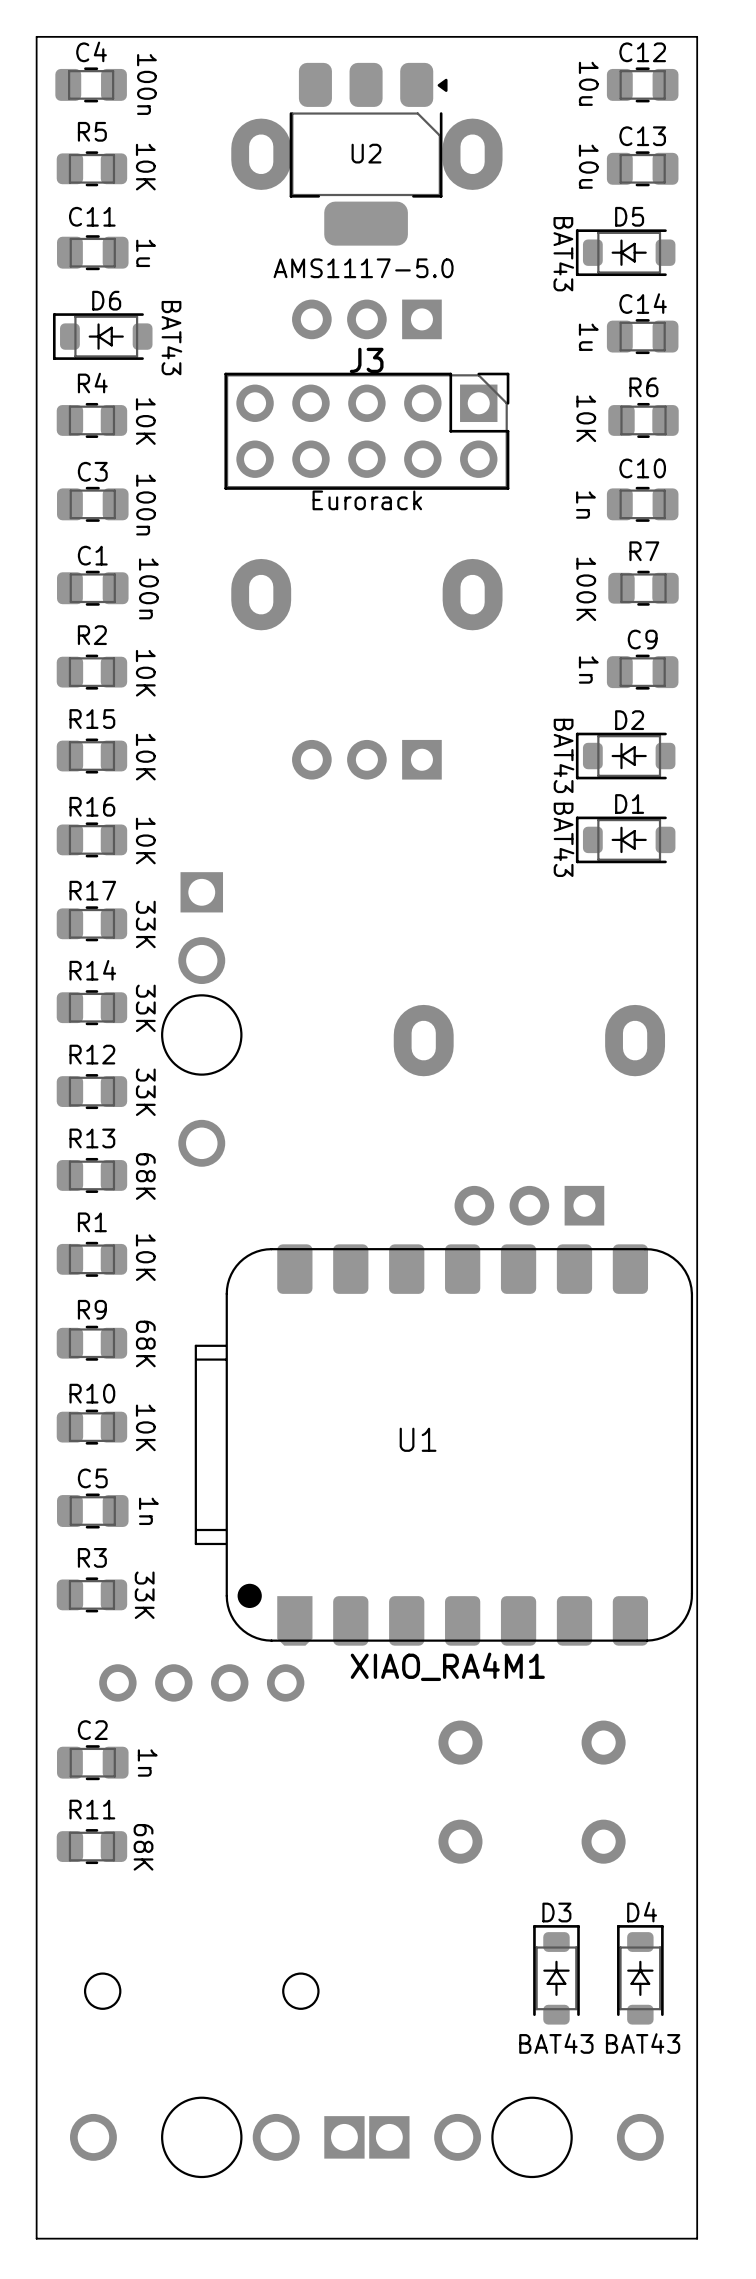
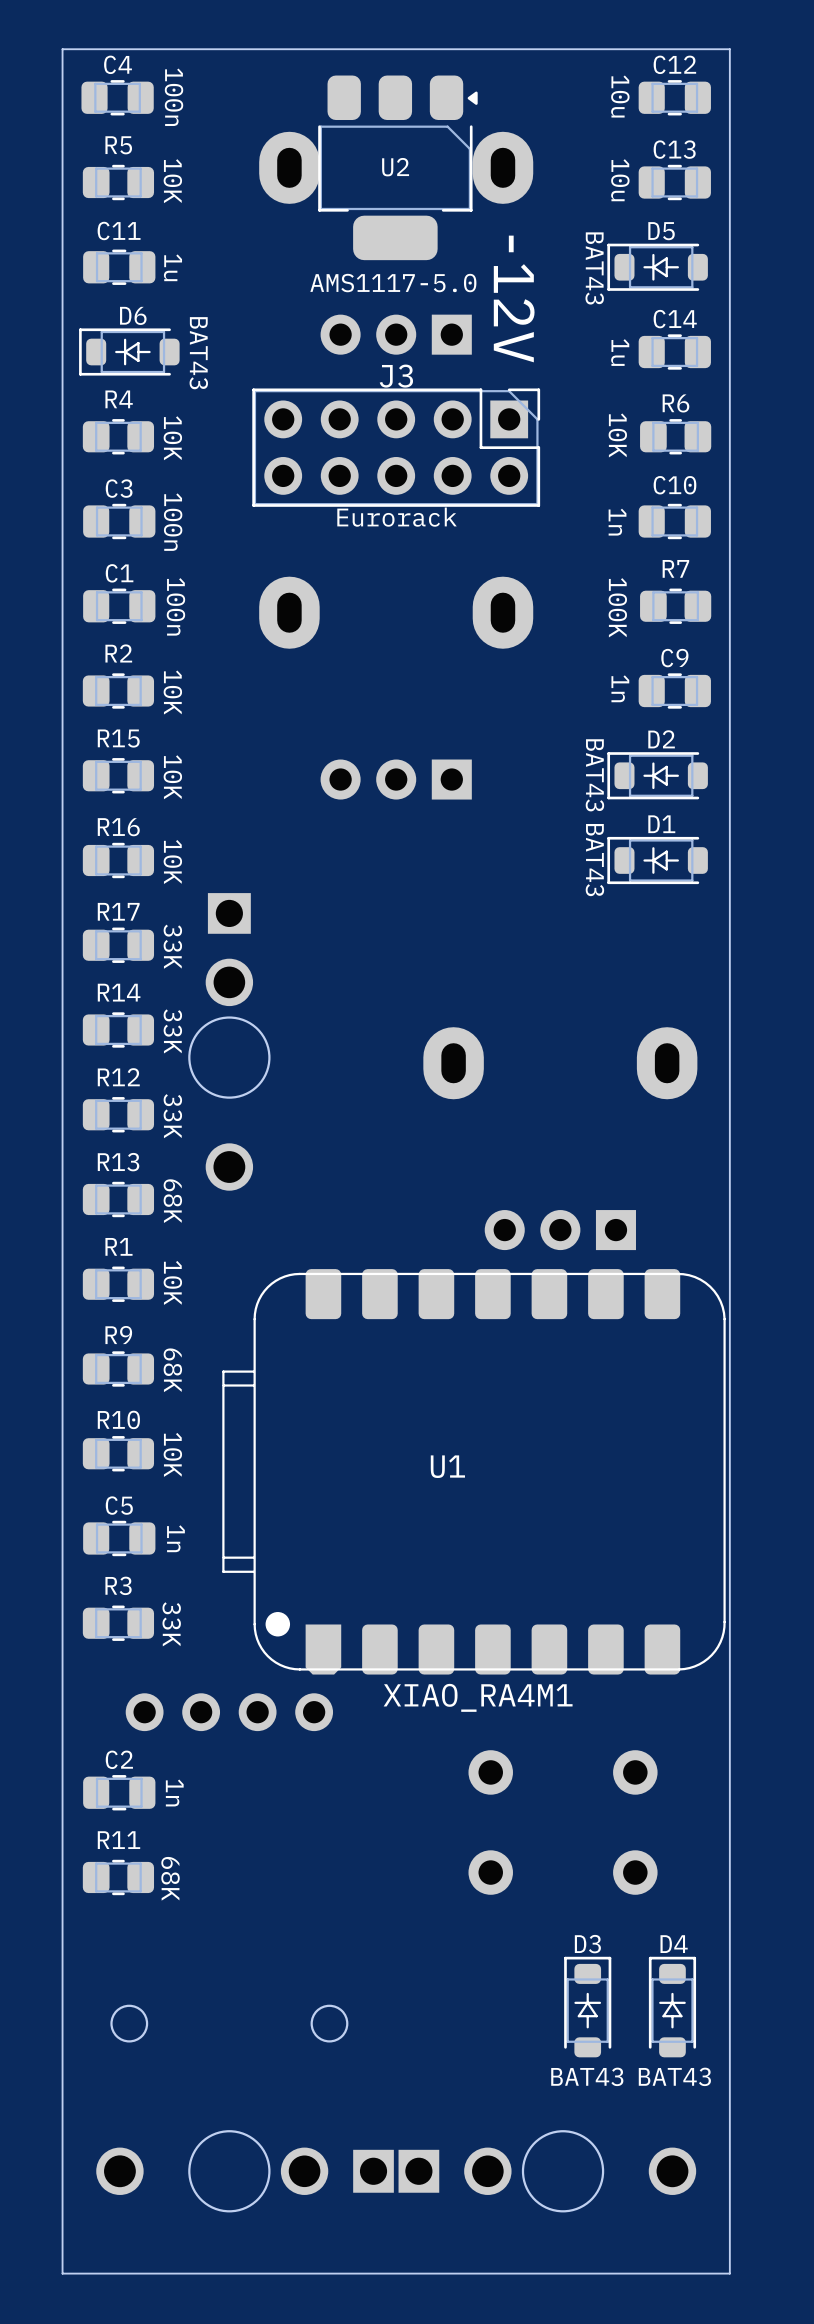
text: none -> -12V (514, 298)

